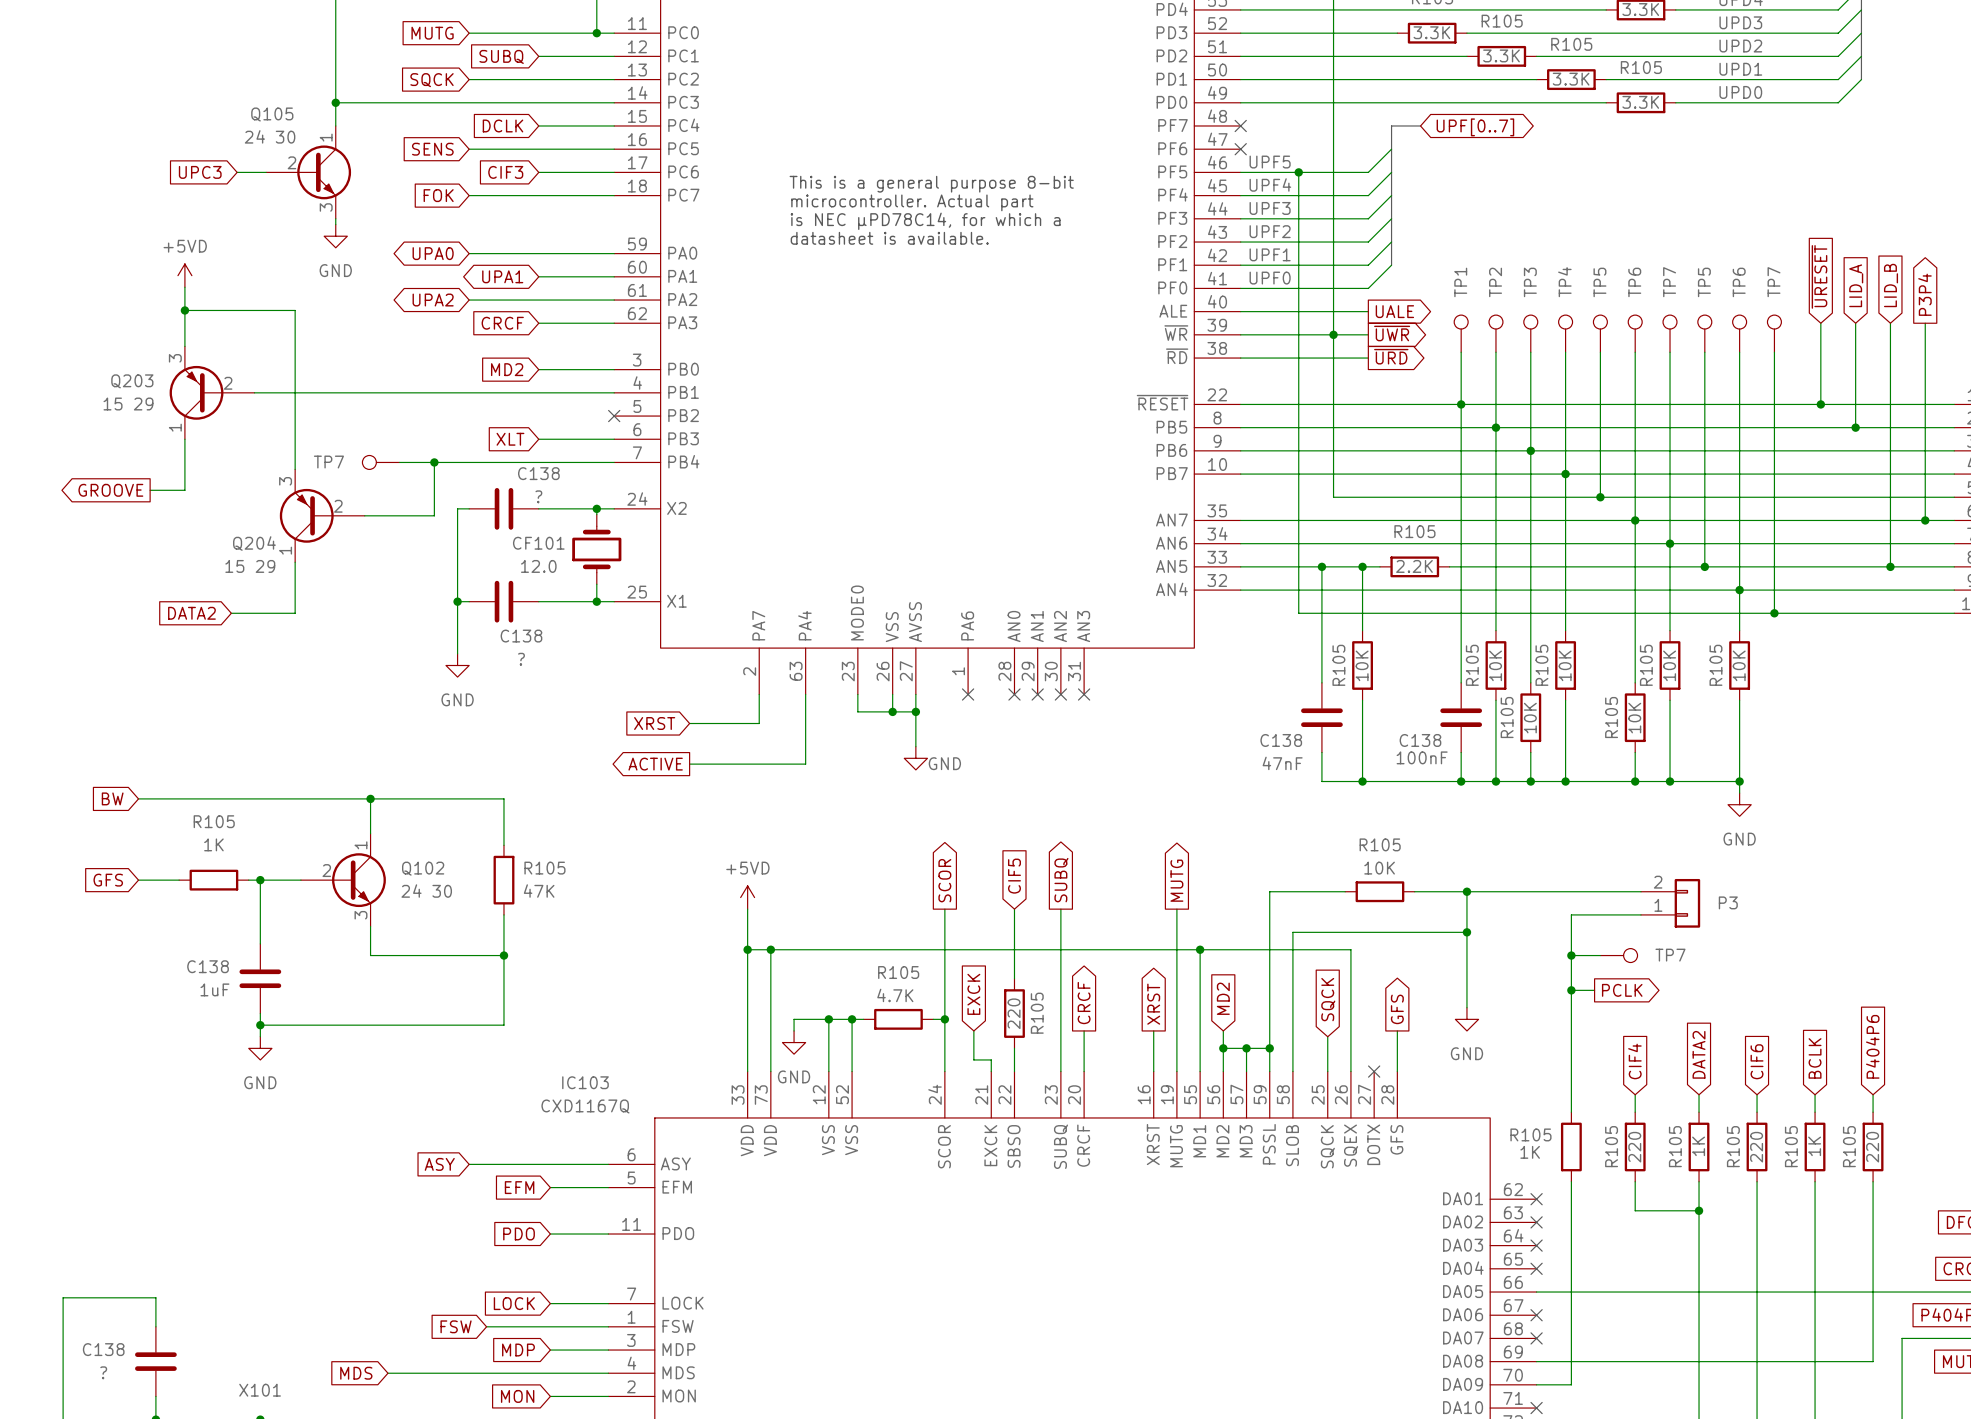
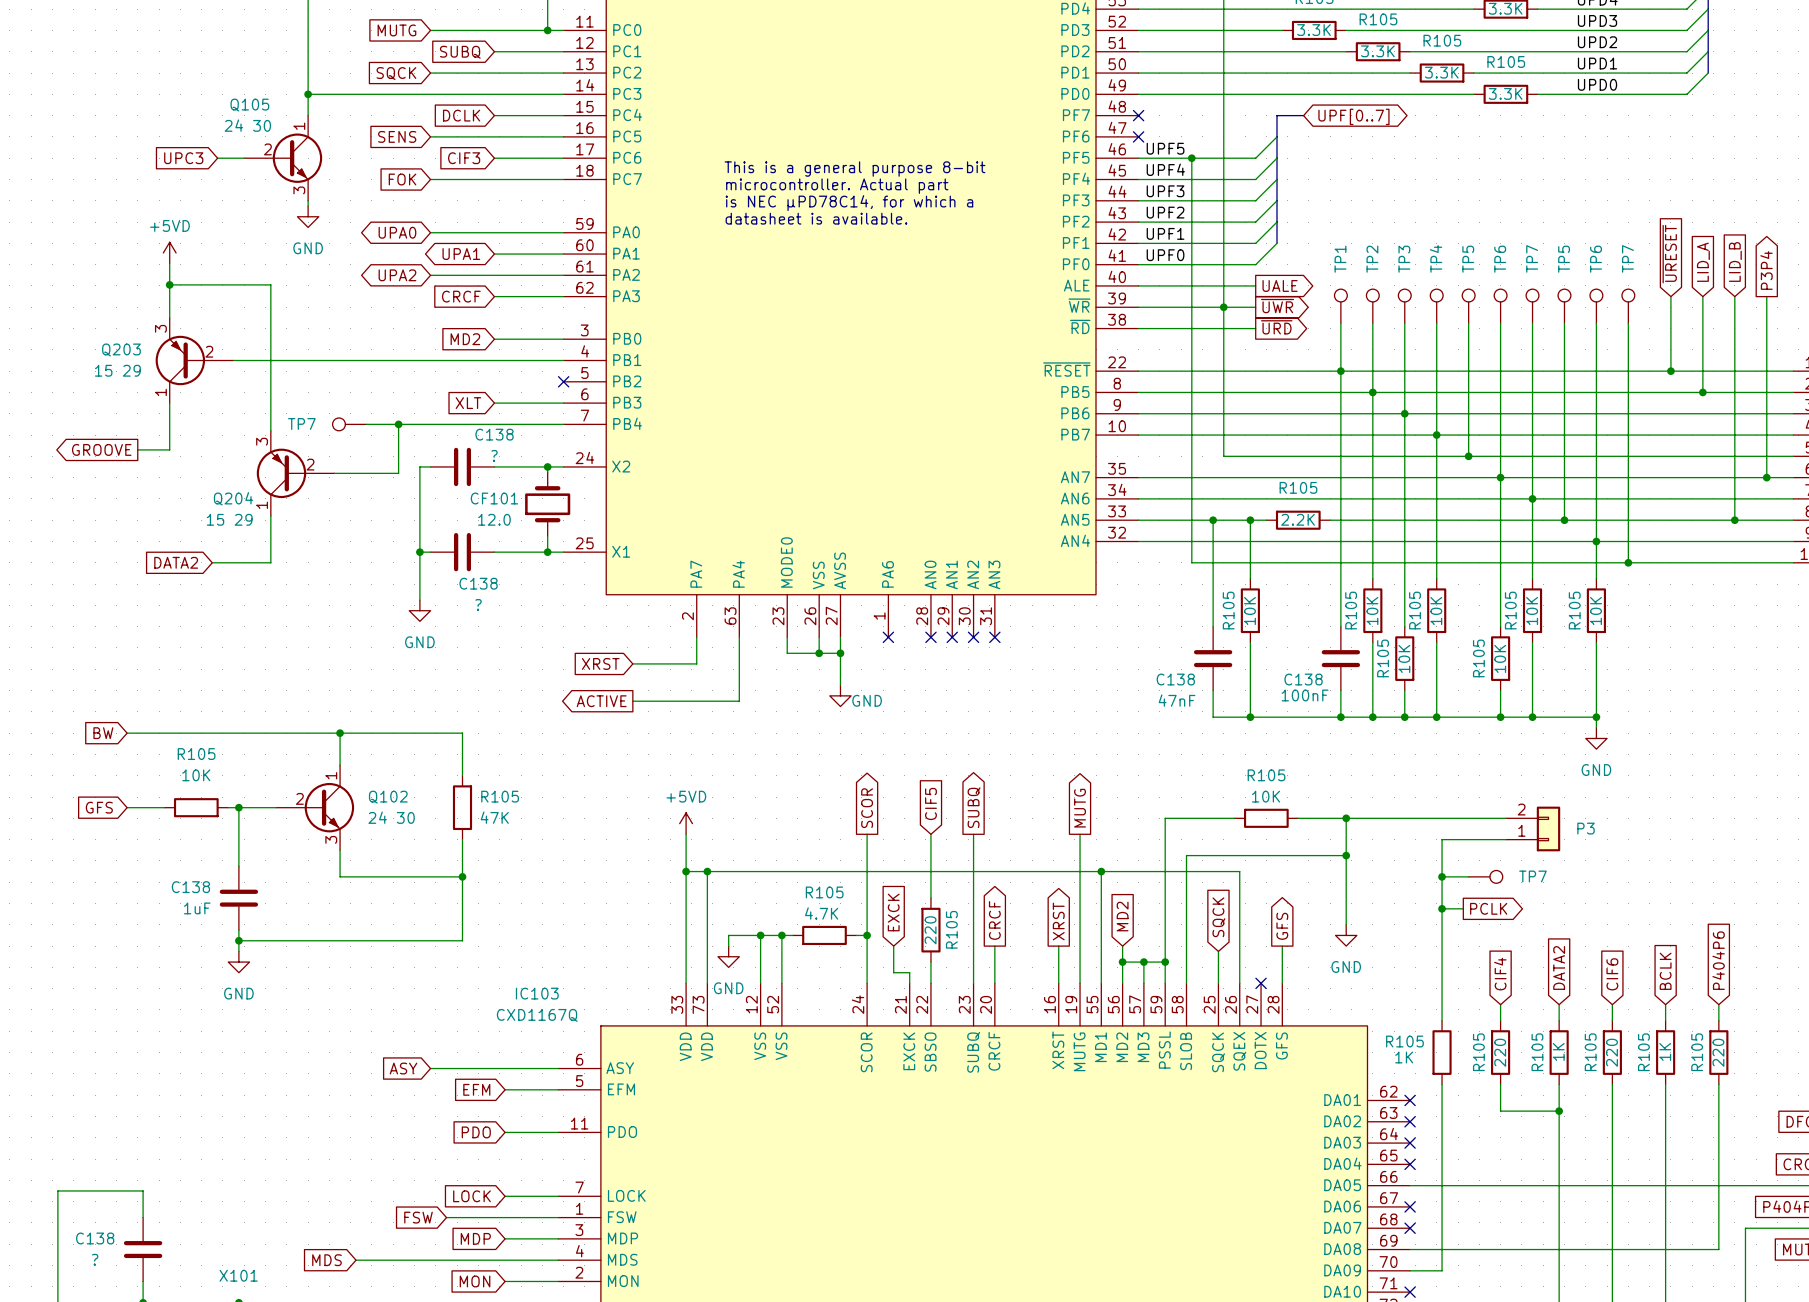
R105 value: 1K (213, 844) -> 10K (196, 775)

